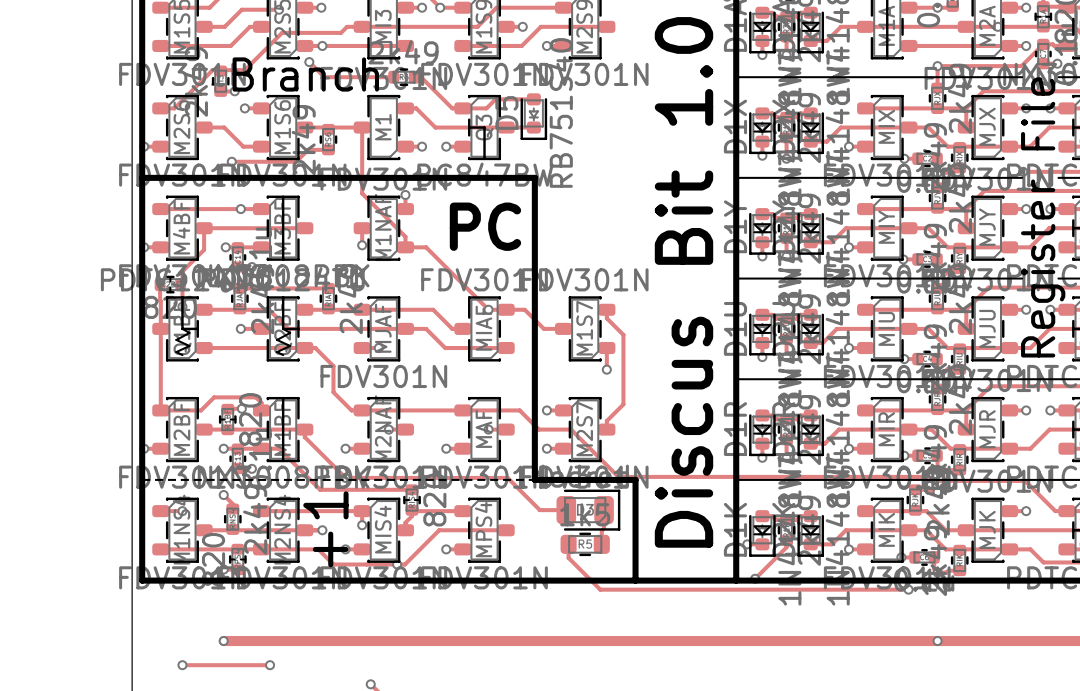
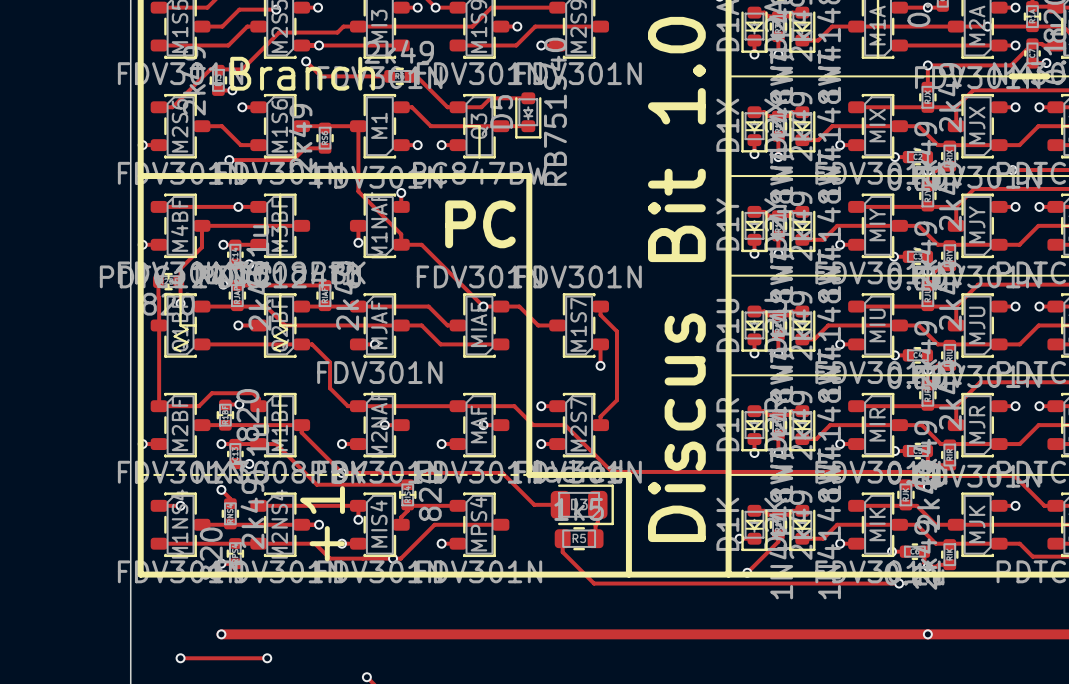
line: none -> (1011, 76) (1047, 76)
line: none -> (1011, 176) (1047, 176)
text: Register File (1043, 217) -> none
line: none -> (1011, 275) (1047, 275)

